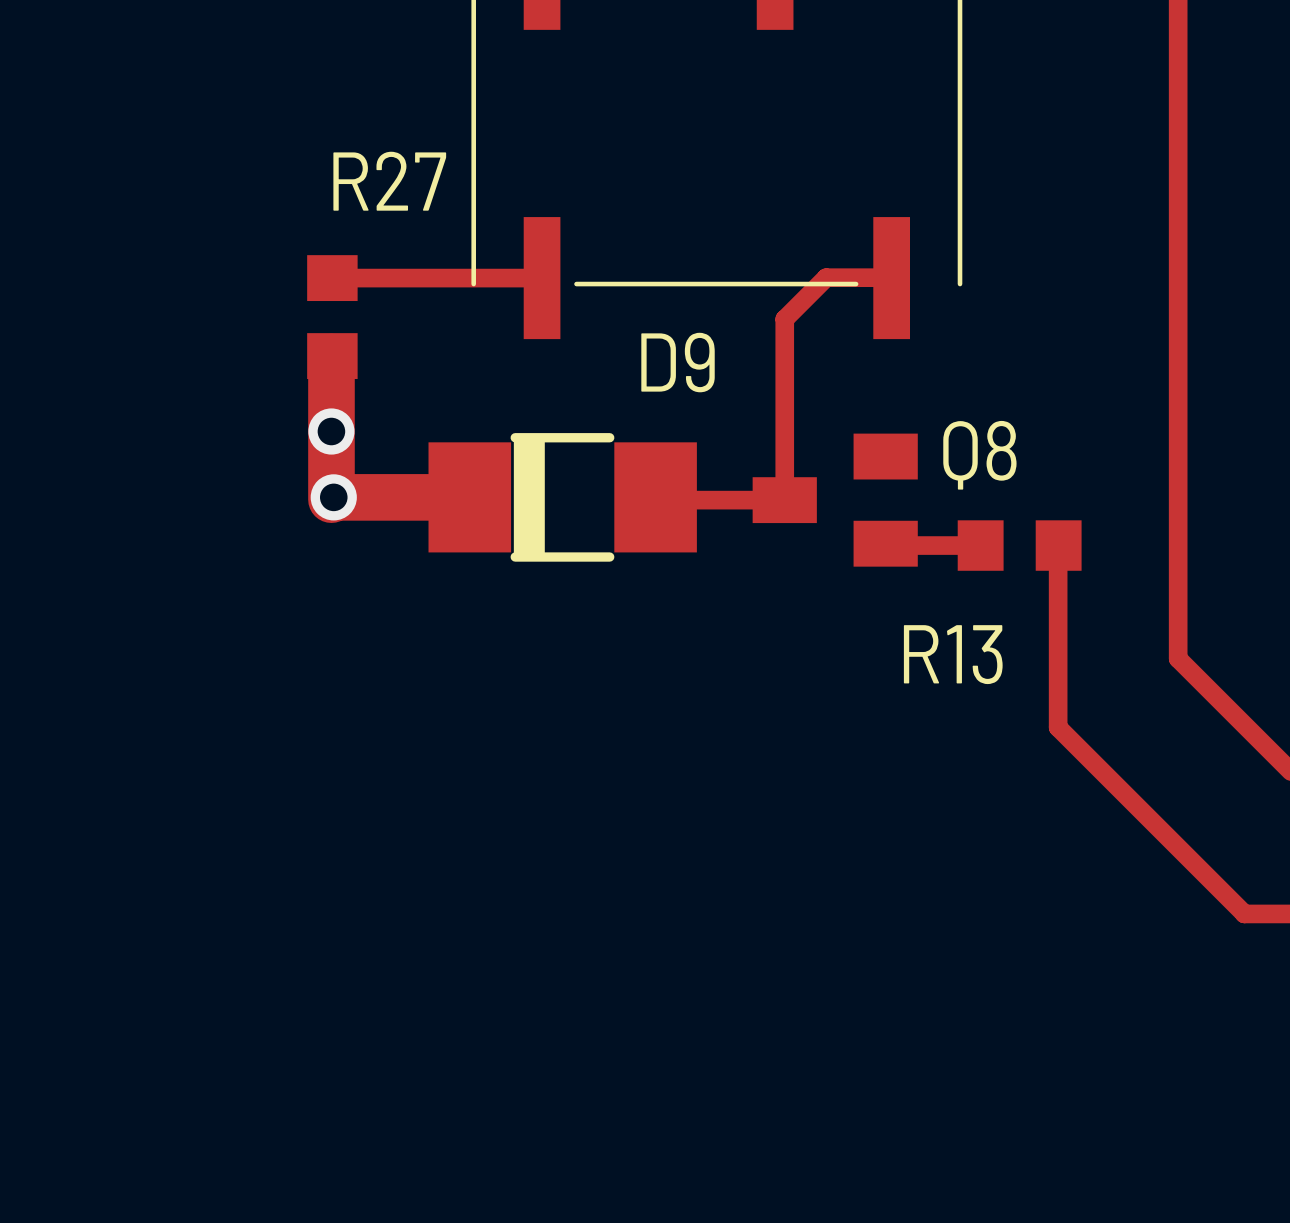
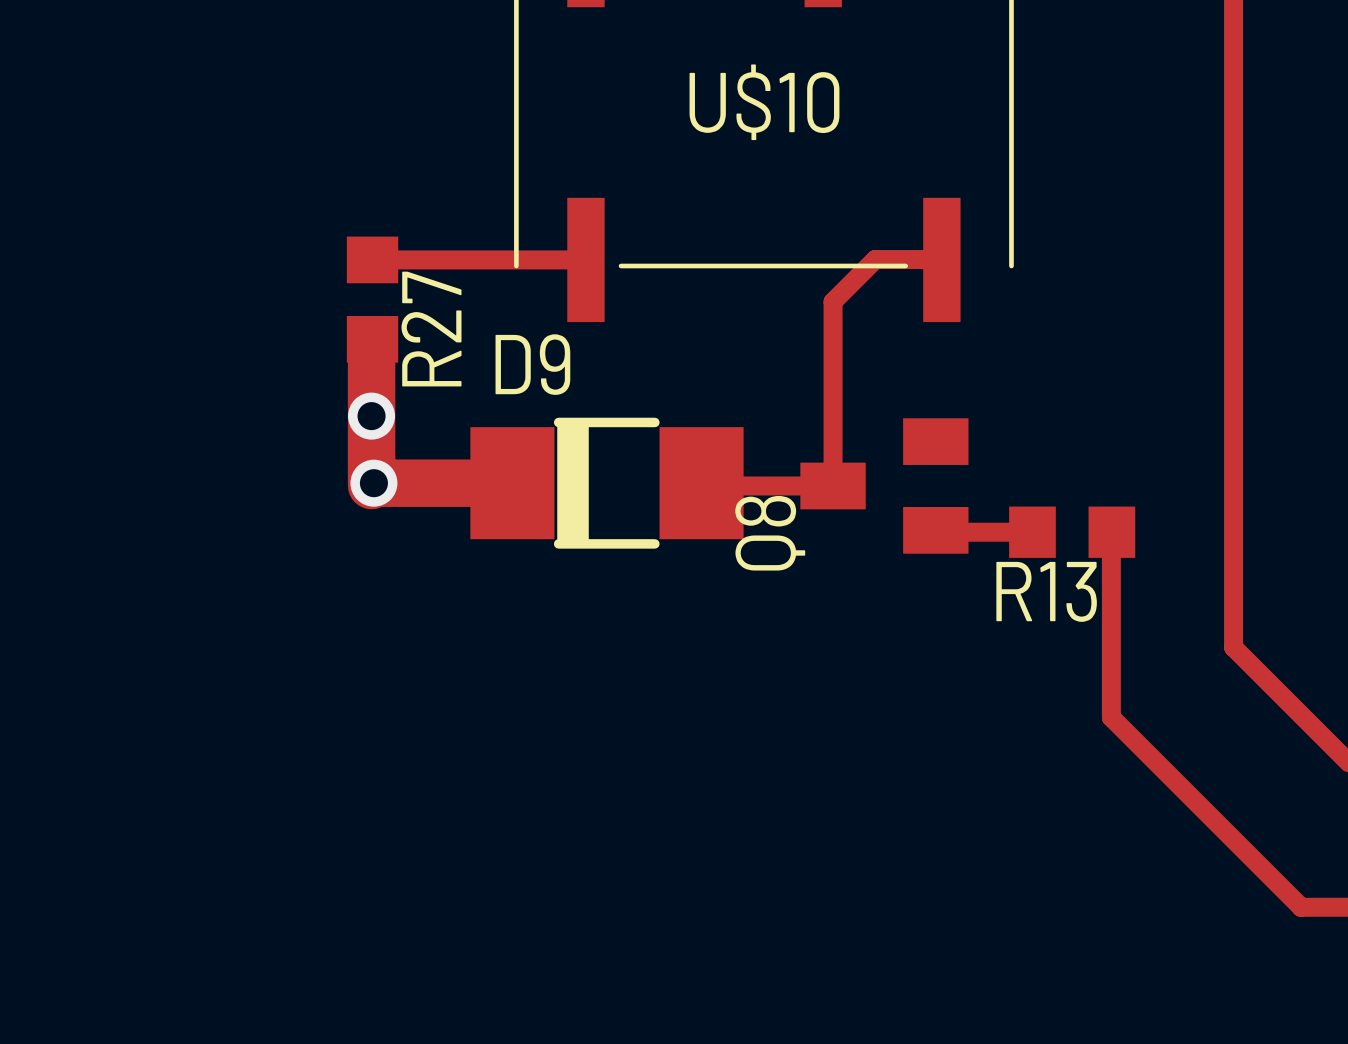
U$10 name: none -> U$10 (764, 102)
R27 name rotation: 0° (389, 181) -> 90° counterclockwise (431, 329)
R27 name position: R27 (389, 181) -> R27 (431, 329)
D9 name position: D9 (678, 362) -> D9 (532, 364)
Q8 name rotation: 0° (979, 455) -> 90° counterclockwise (770, 533)
Q8 name position: Q8 (979, 455) -> Q8 (770, 533)
R13 name position: R13 (953, 654) -> R13 (1046, 591)

